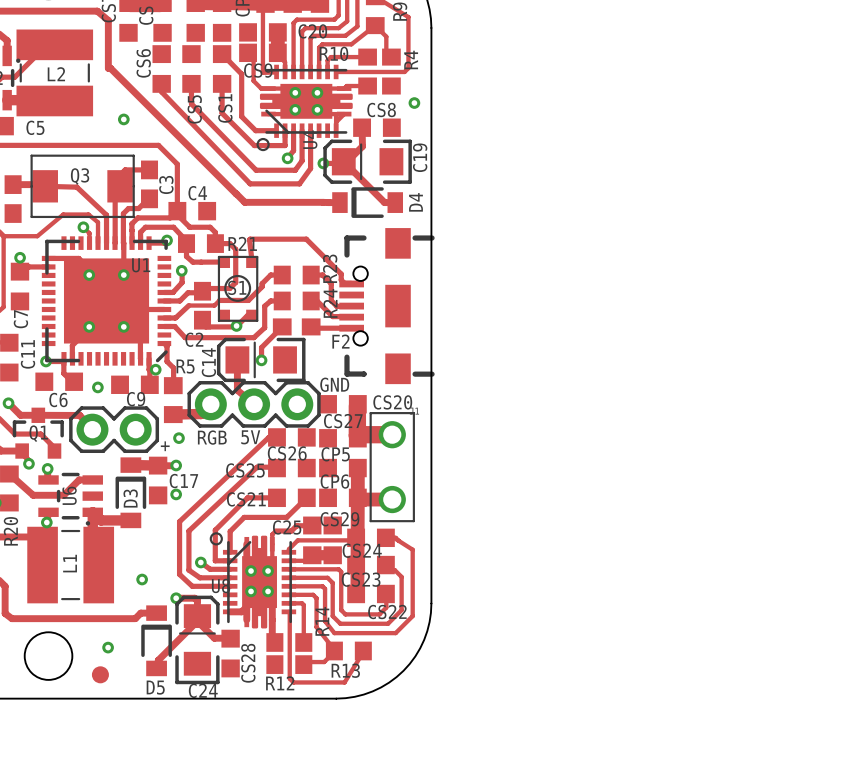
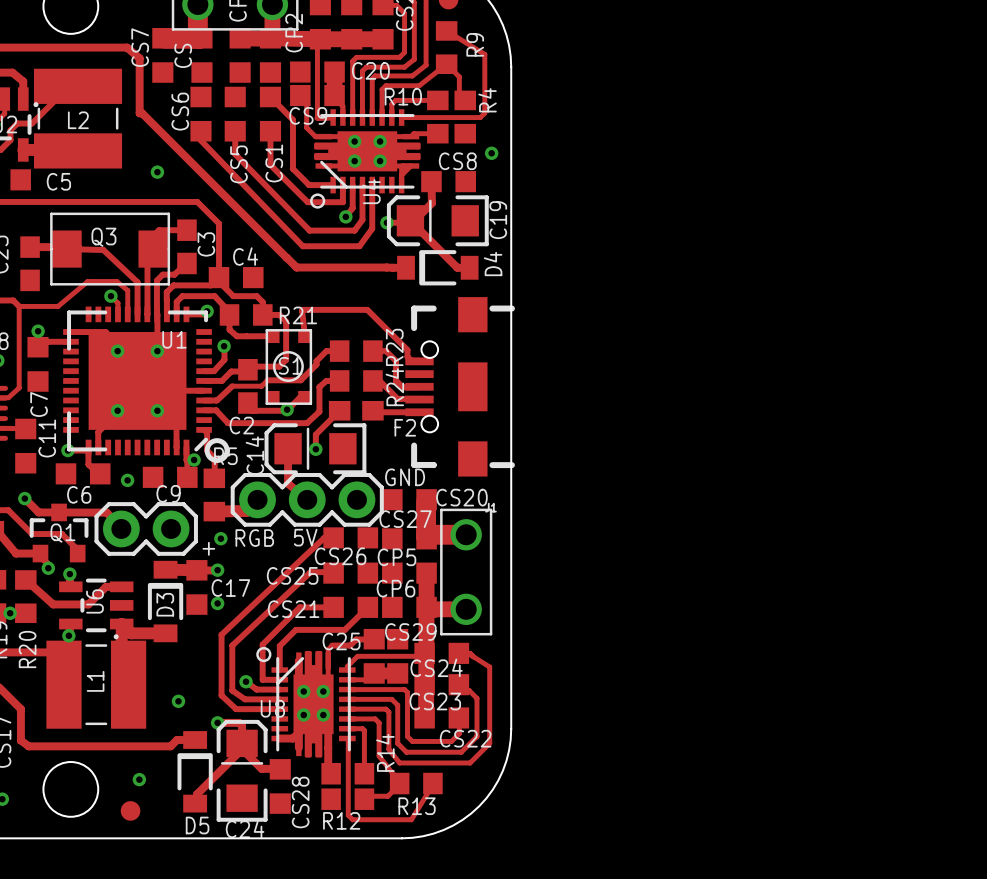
drawing: none -> [204, 438, 230, 463]

